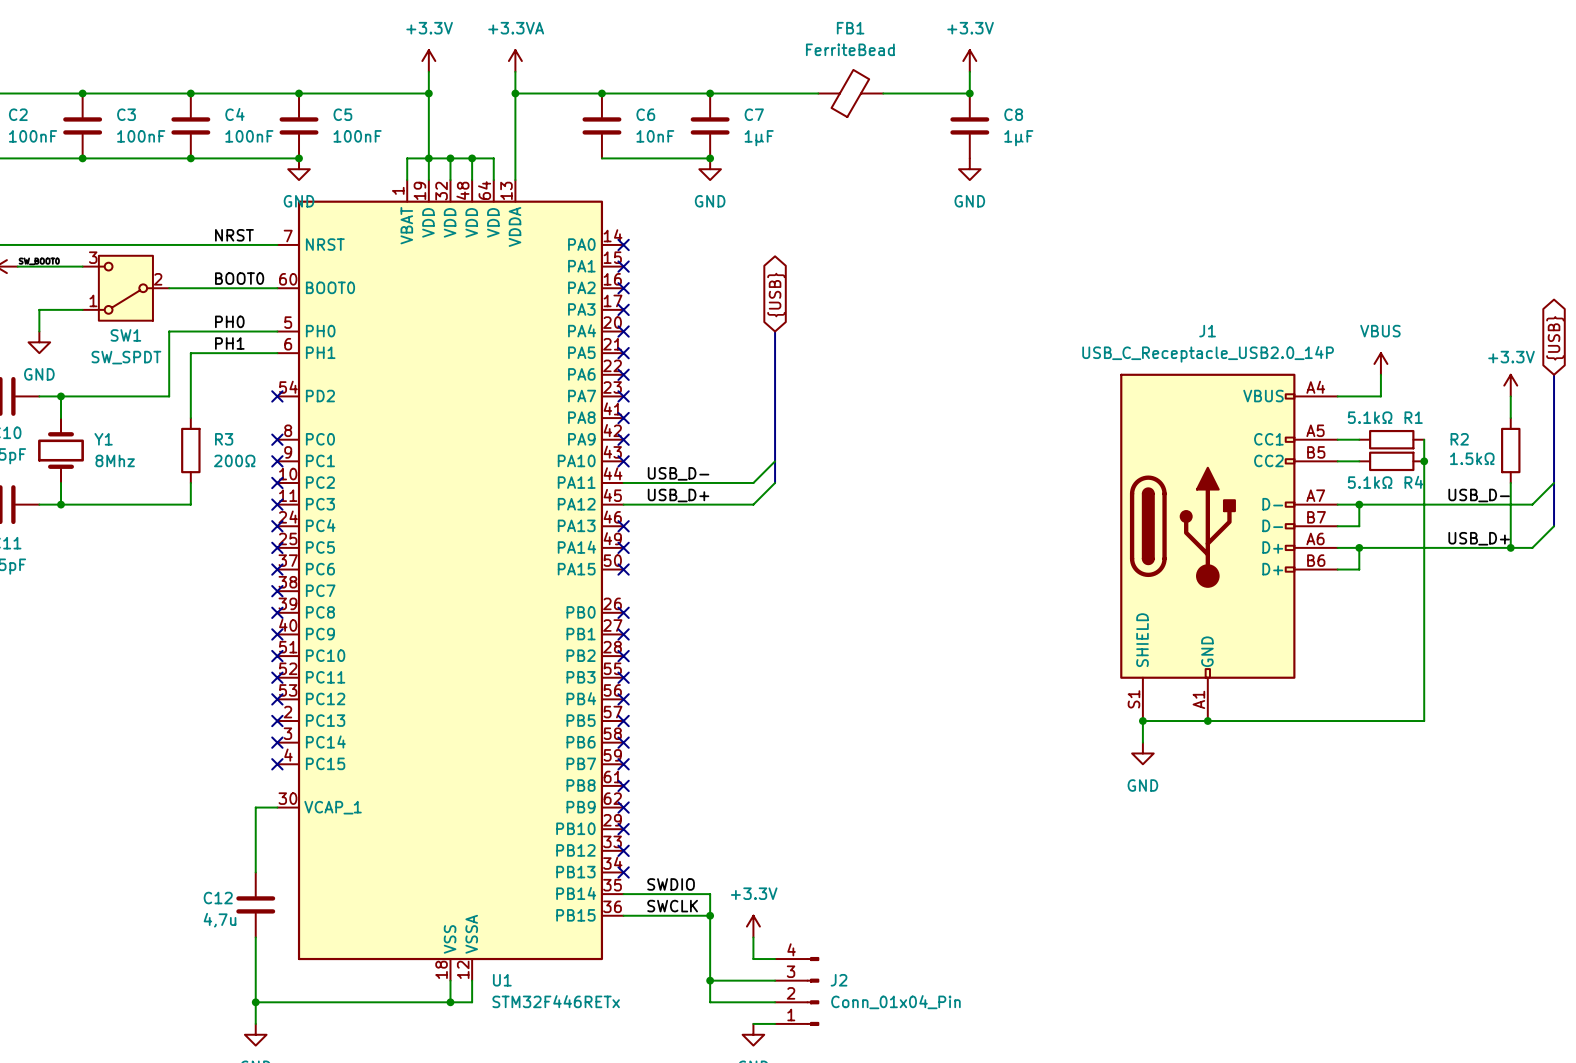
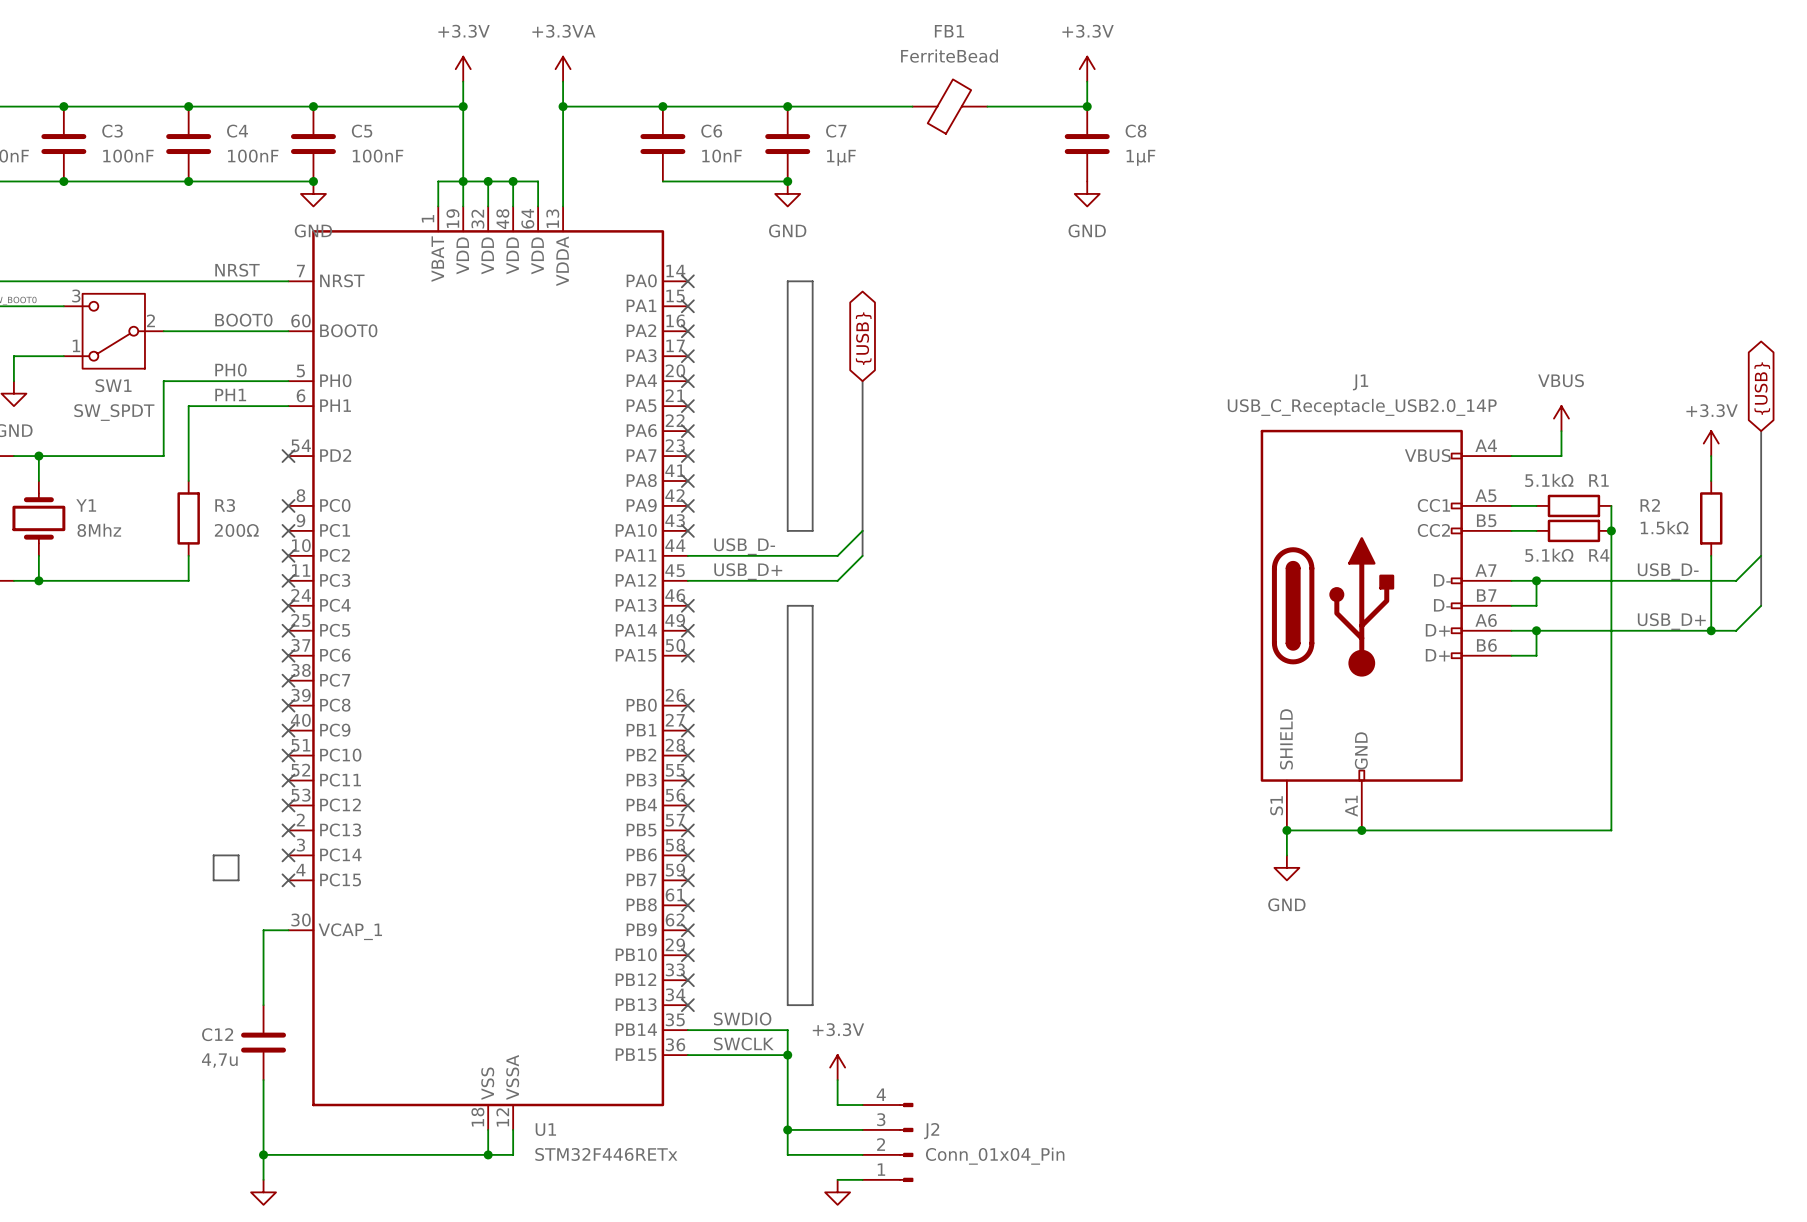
line: none -> (787, 281) (787, 530) (812, 530) (812, 281) (787, 281)
line: none -> (787, 605) (812, 605) (812, 1005) (787, 1005) (787, 605)
line: none -> (213, 855) (238, 855) (238, 880) (213, 880) (213, 855)

